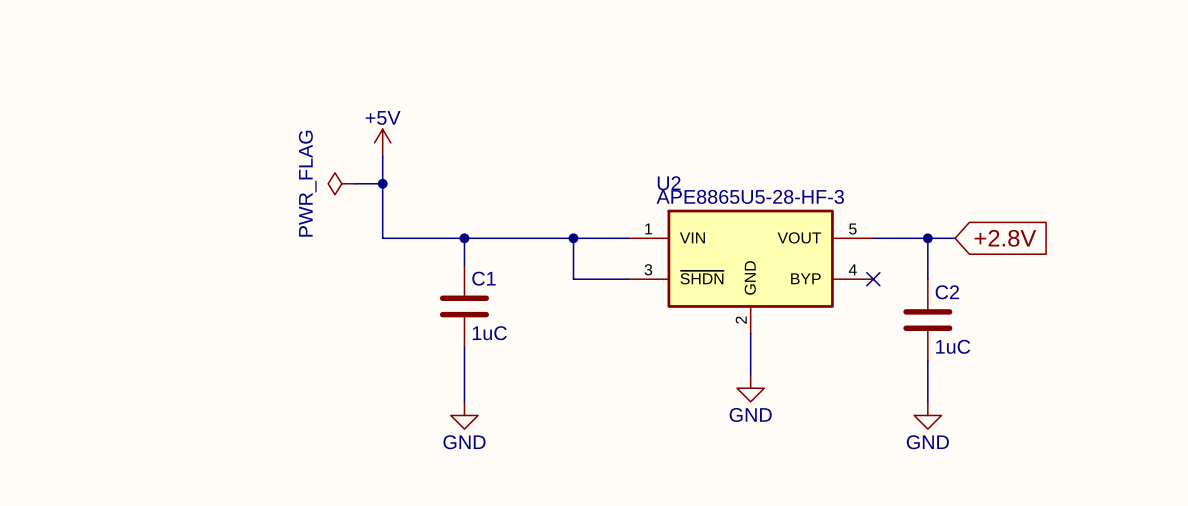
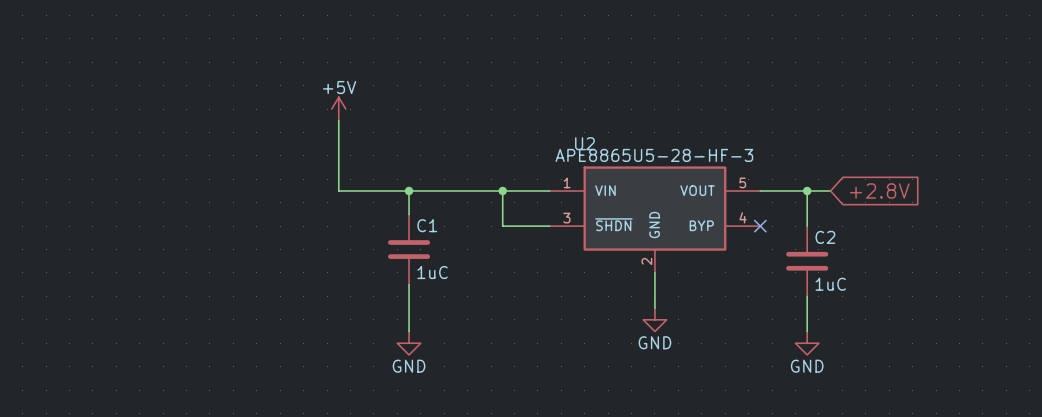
power symbol: PWR_FLAG (341, 183) -> none
wire: (355, 183) (382, 183) -> none
junction: (382, 183) -> none

